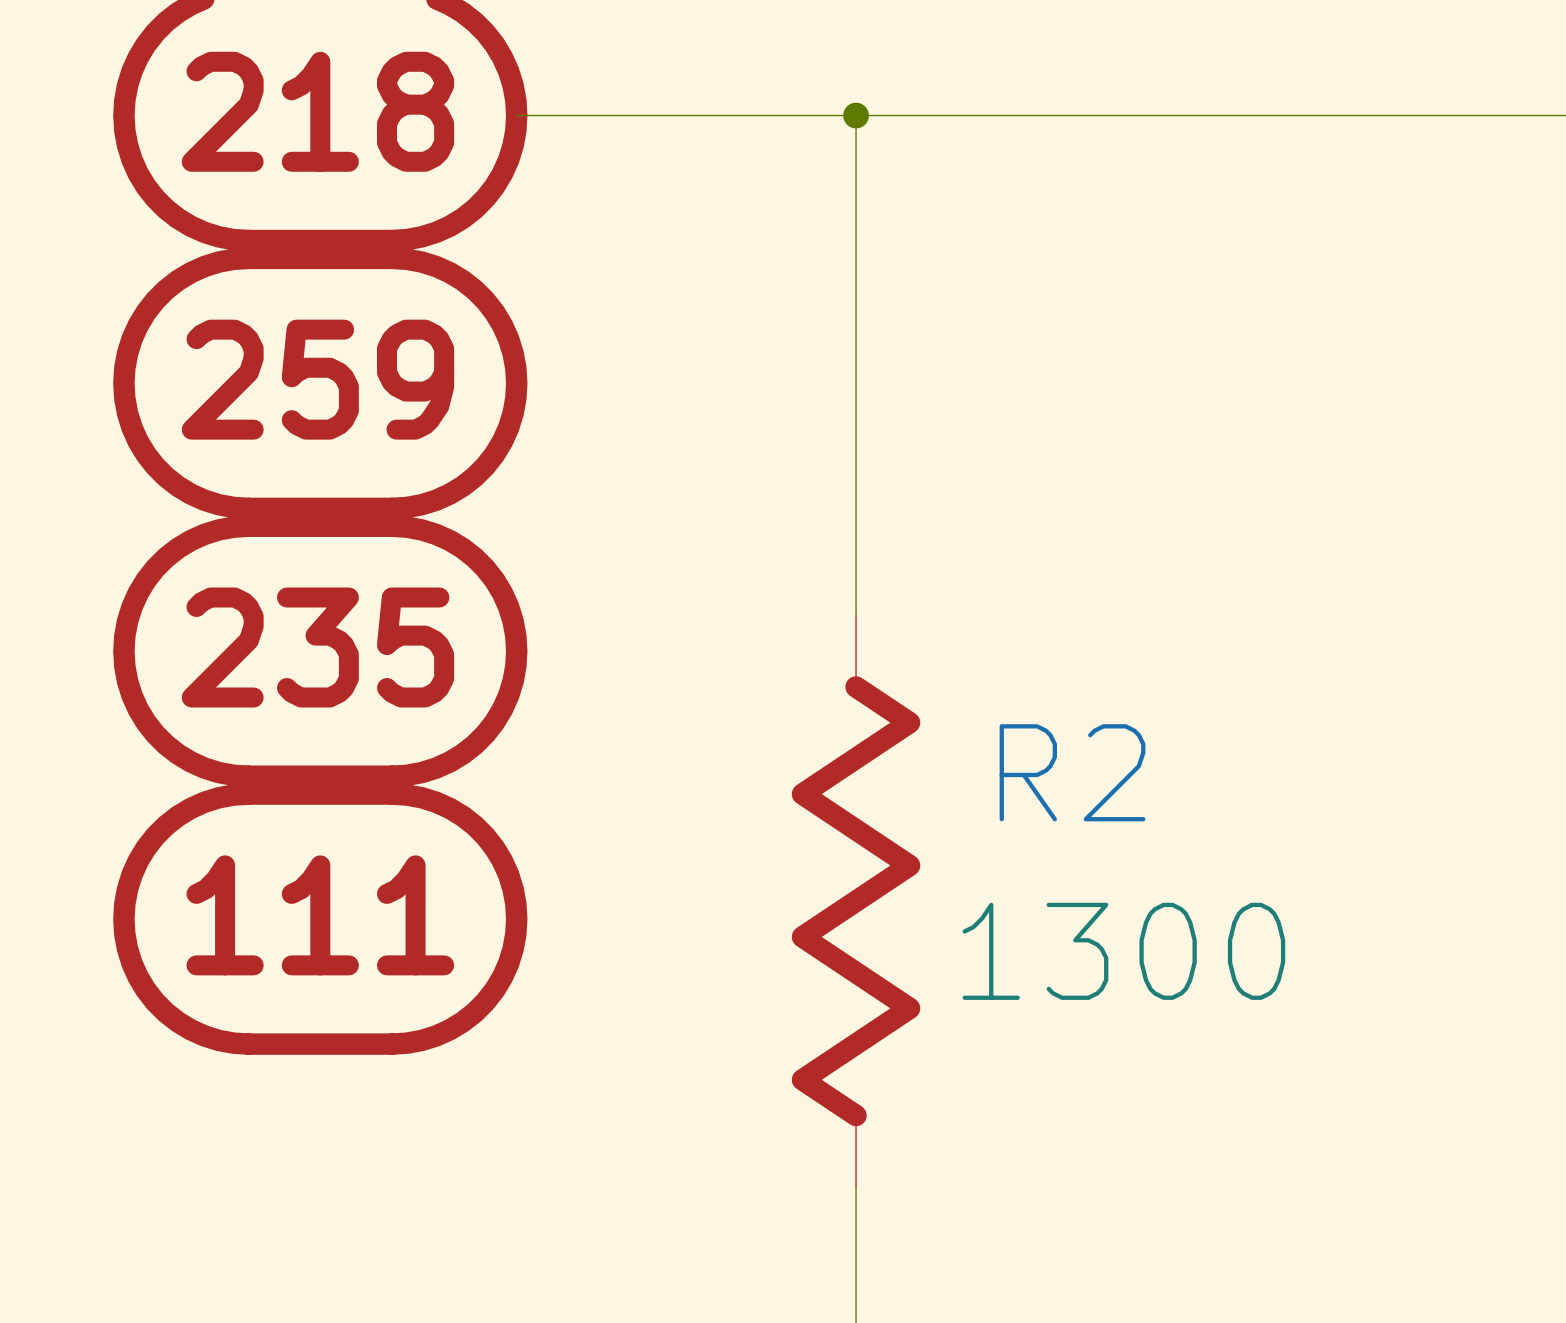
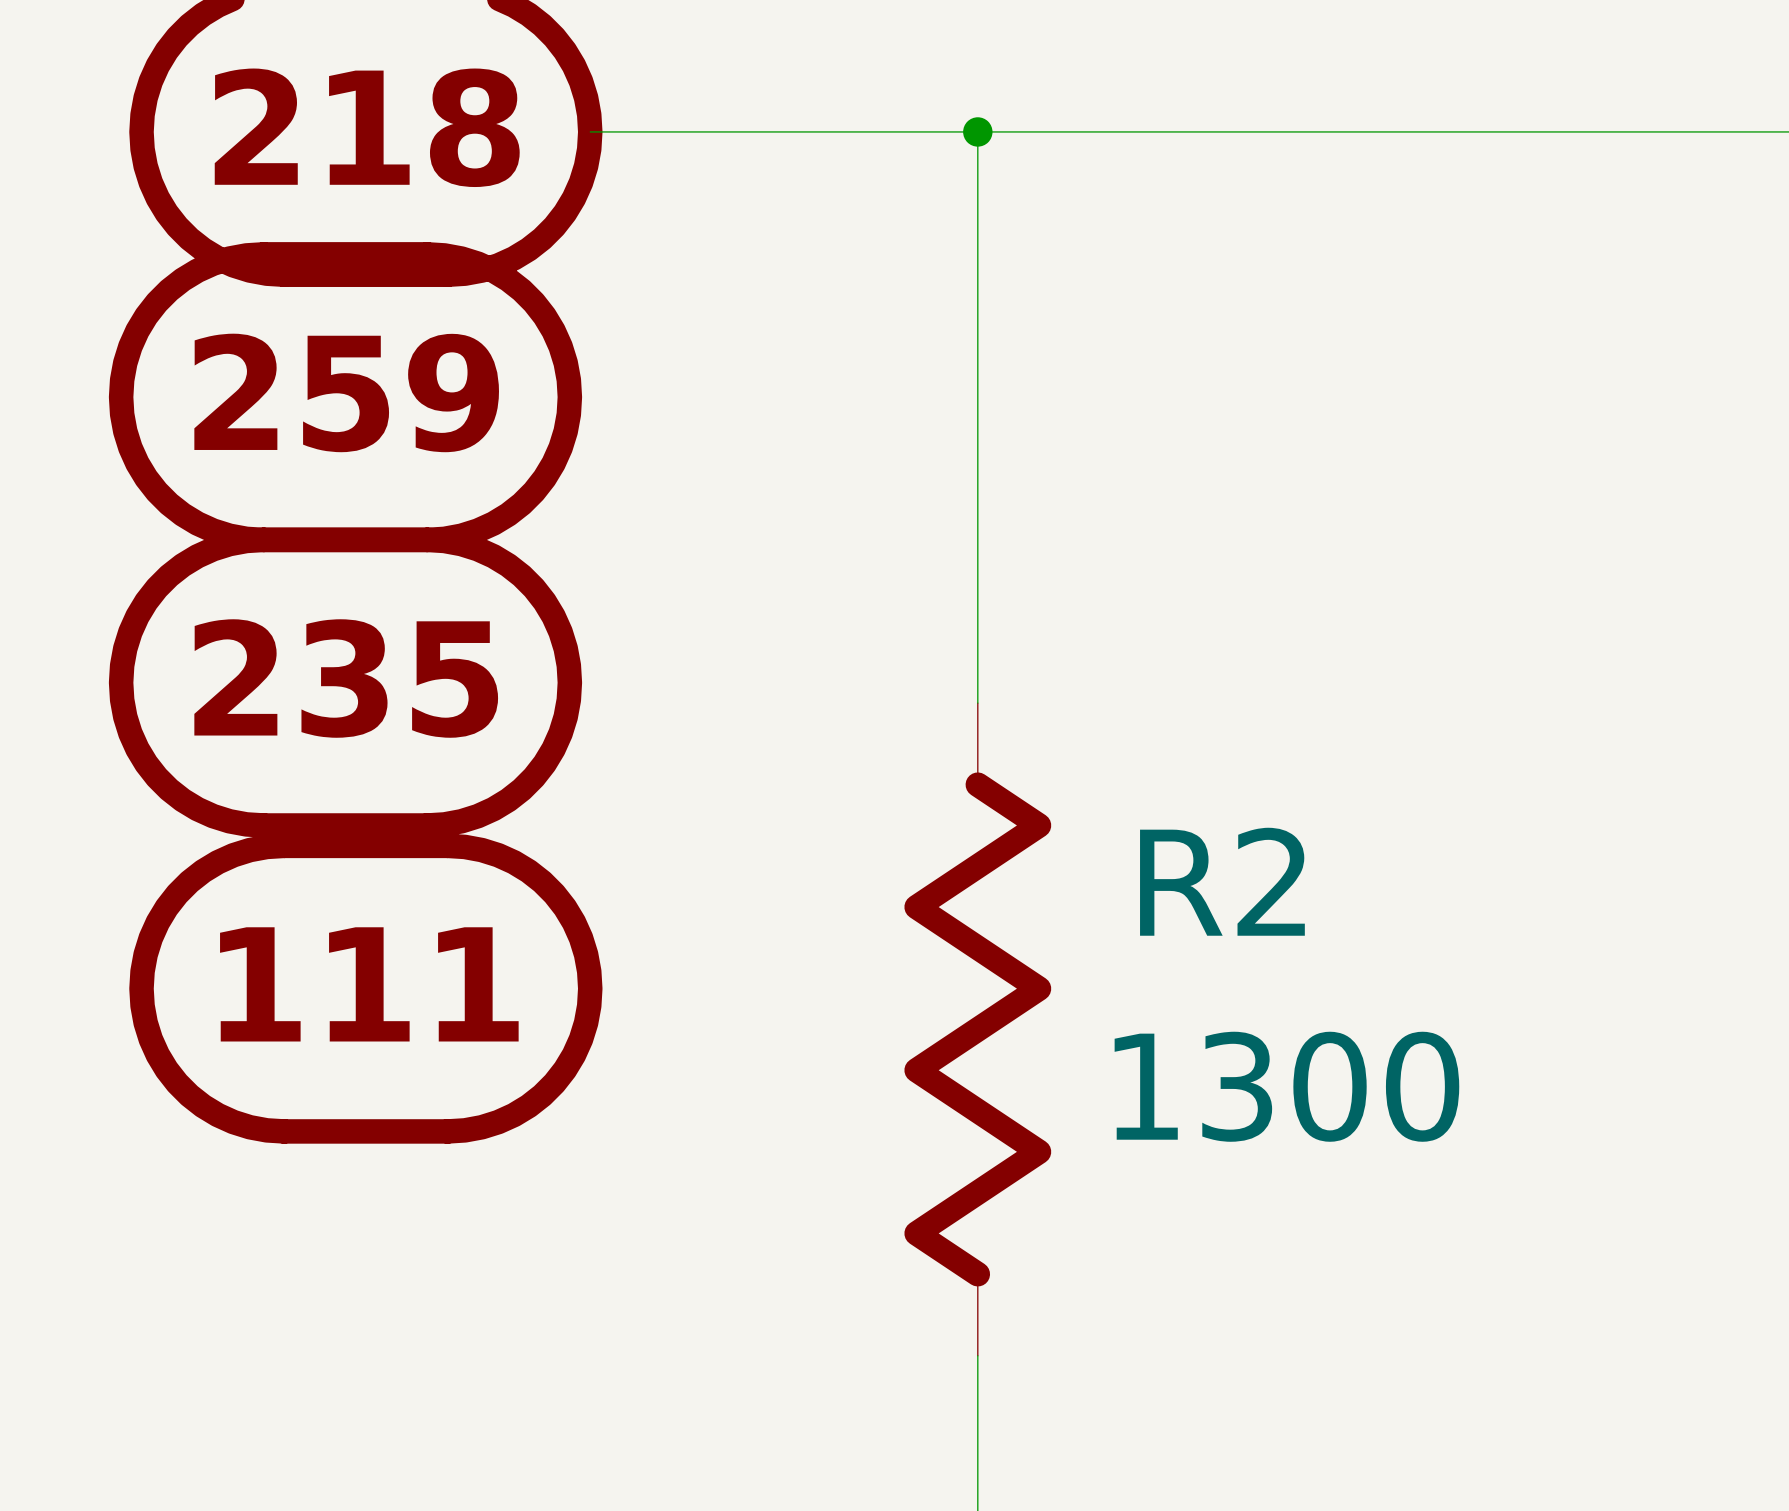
part position: (320, 383) -> (345, 397)
part position: (320, 651) -> (345, 682)
part position: (320, 919) -> (365, 988)

